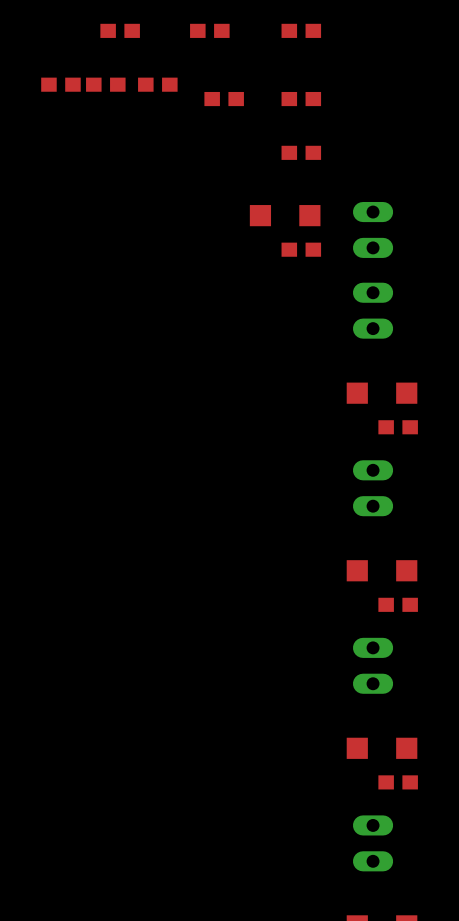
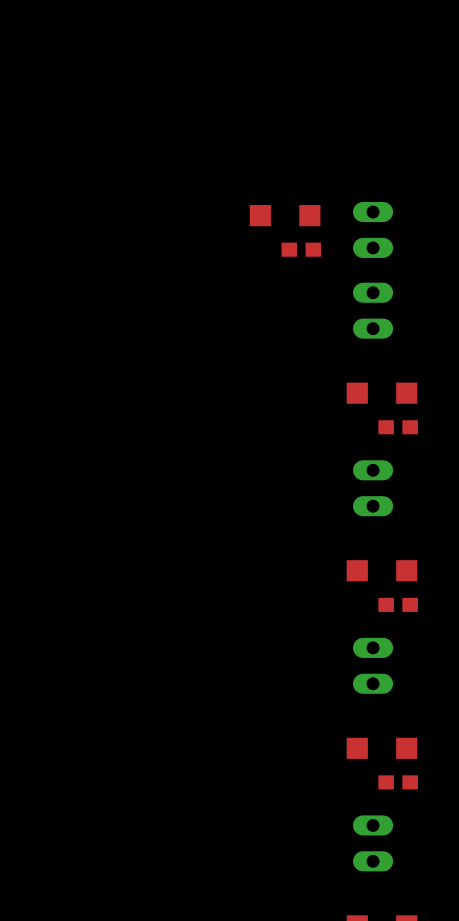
part: (120, 30) -> none
part: (209, 30) -> none
part: (301, 30) -> none
part: (60, 84) -> none
part: (105, 84) -> none
part: (157, 84) -> none
part: (224, 99) -> none
part: (301, 99) -> none
part: (301, 152) -> none

